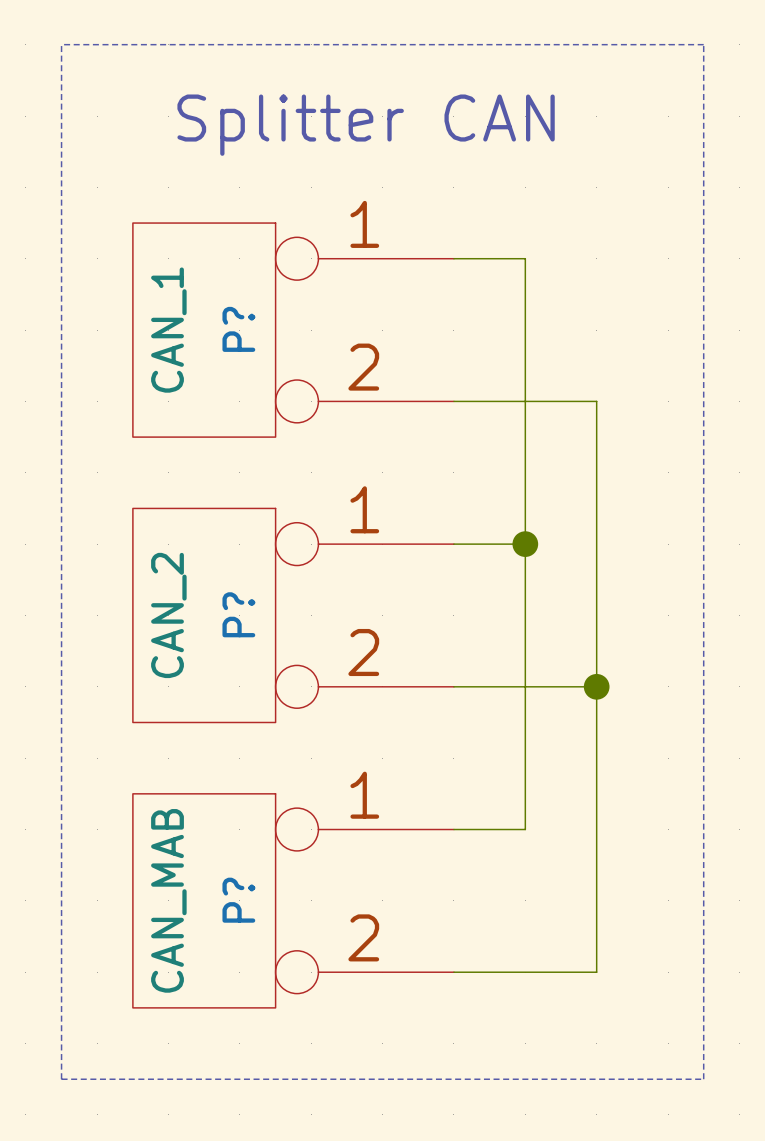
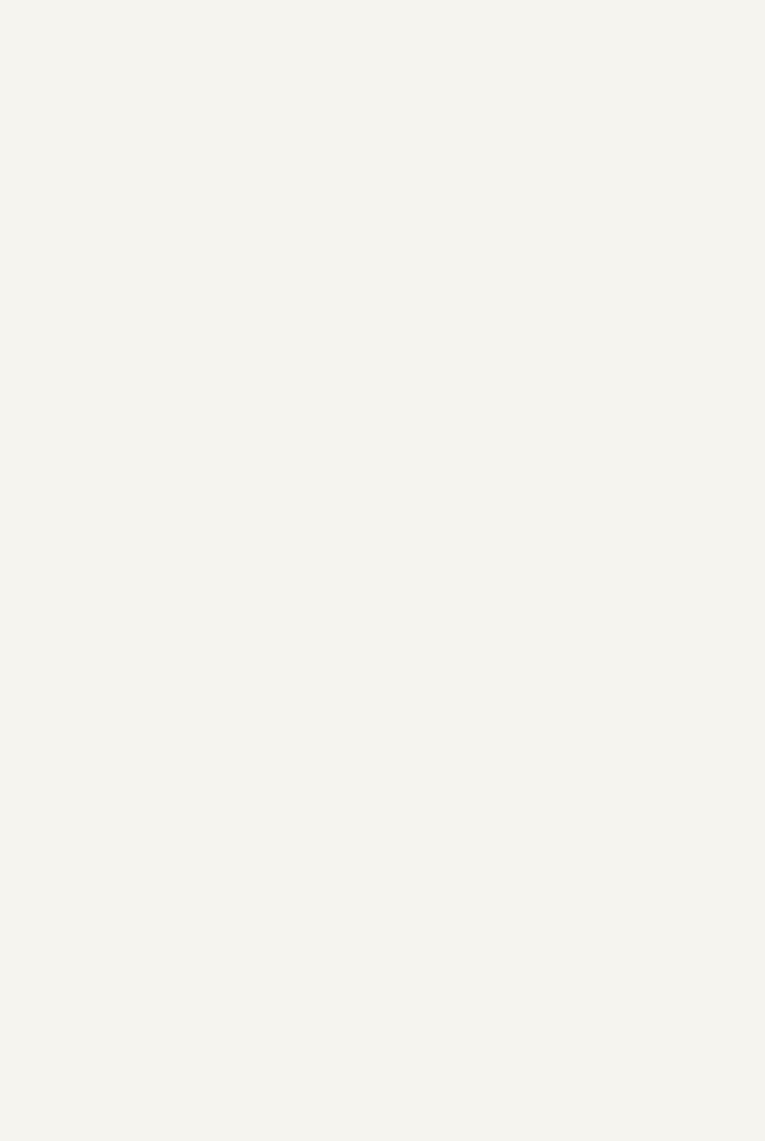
line: (61, 44) (61, 1079) (703, 1079) (703, 44) (61, 44) -> none
text: Splitter CAN (366, 125) -> none
wire: (453, 258) (525, 258) (525, 829) (453, 829) -> none
P?: CAN_1 (293, 330) -> none
wire: (453, 401) (596, 401) (596, 972) (453, 972) -> none
wire: (453, 544) (525, 544) -> none
junction: (525, 544) -> none
P?: CAN_2 (293, 615) -> none
wire: (453, 686) (596, 686) -> none
junction: (596, 686) -> none
P?: CAN_MAB (293, 900) -> none

